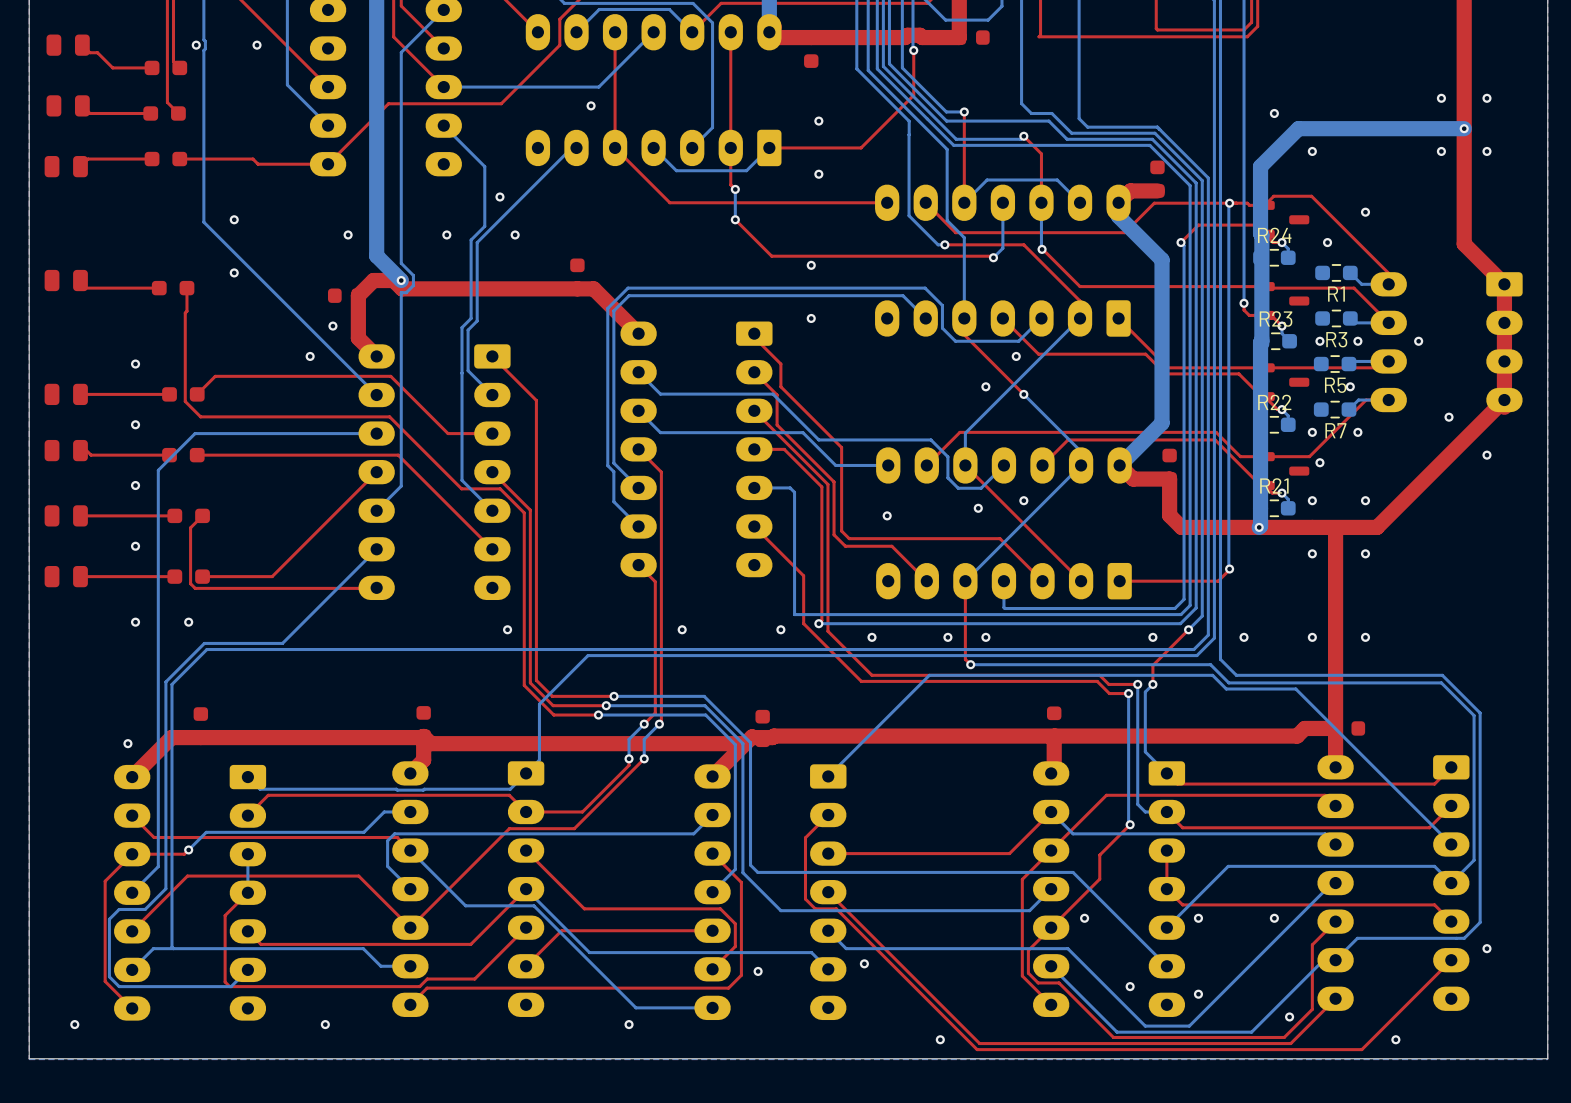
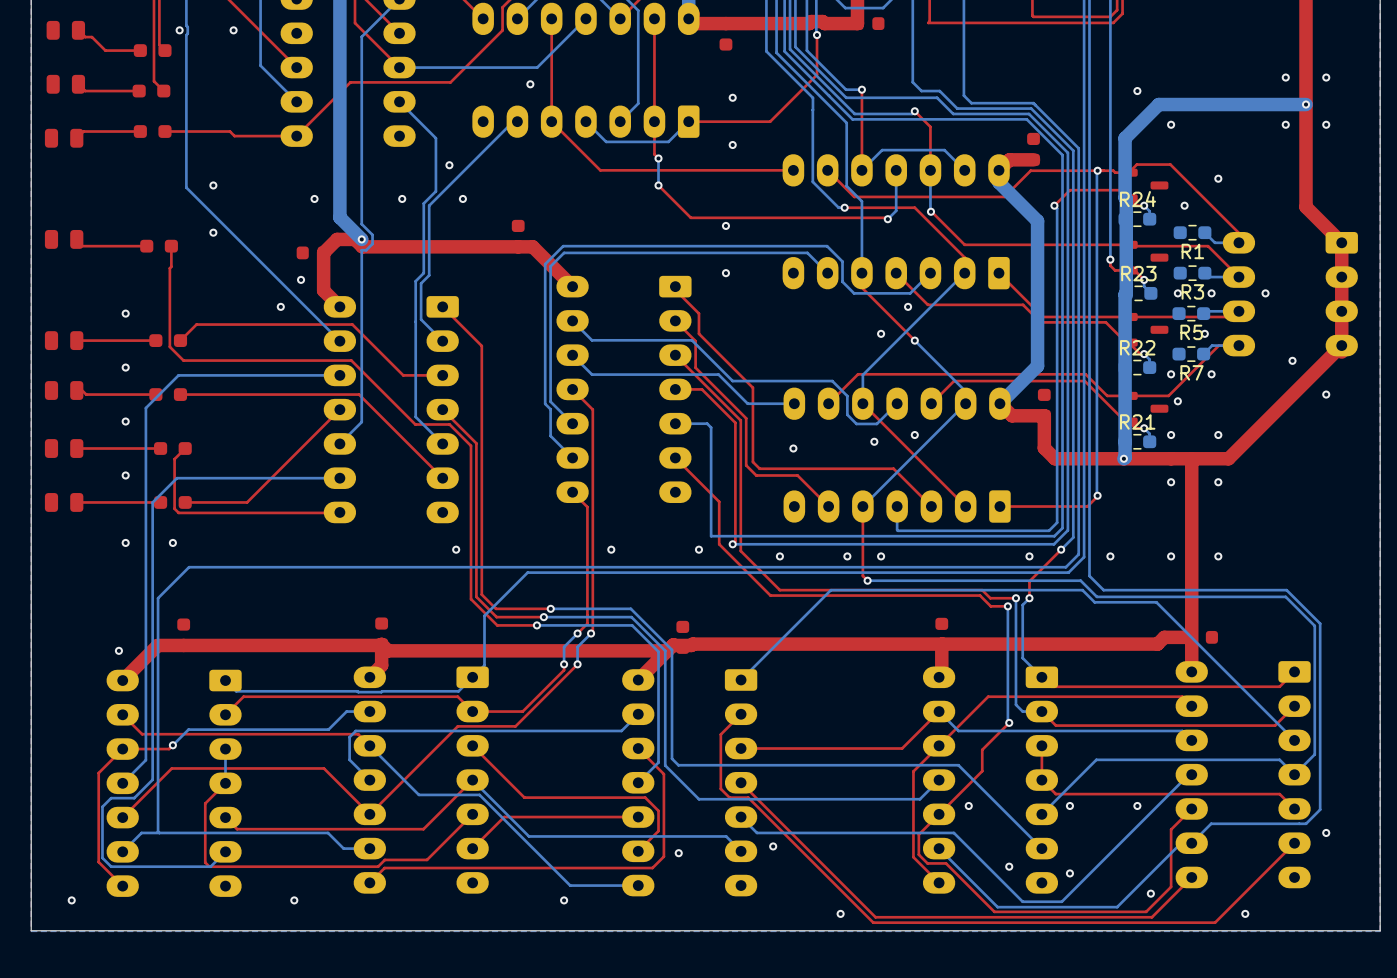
bottom track: (376, 549) (282, 643) (204, 643) (165, 681) -> (339, 478) (176, 478) (152, 502) (152, 596)

